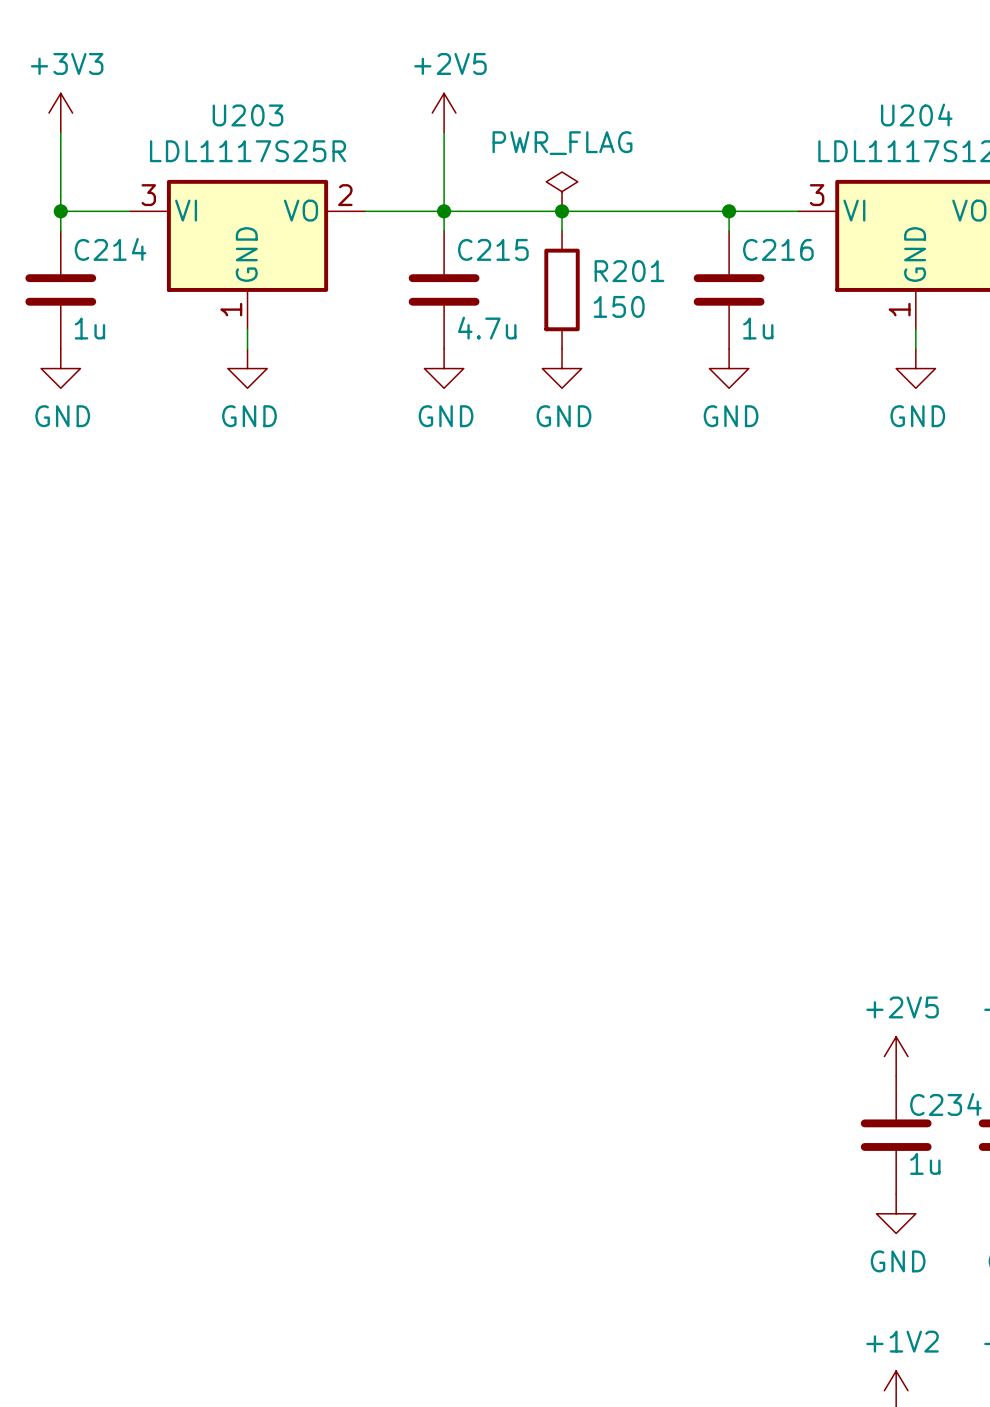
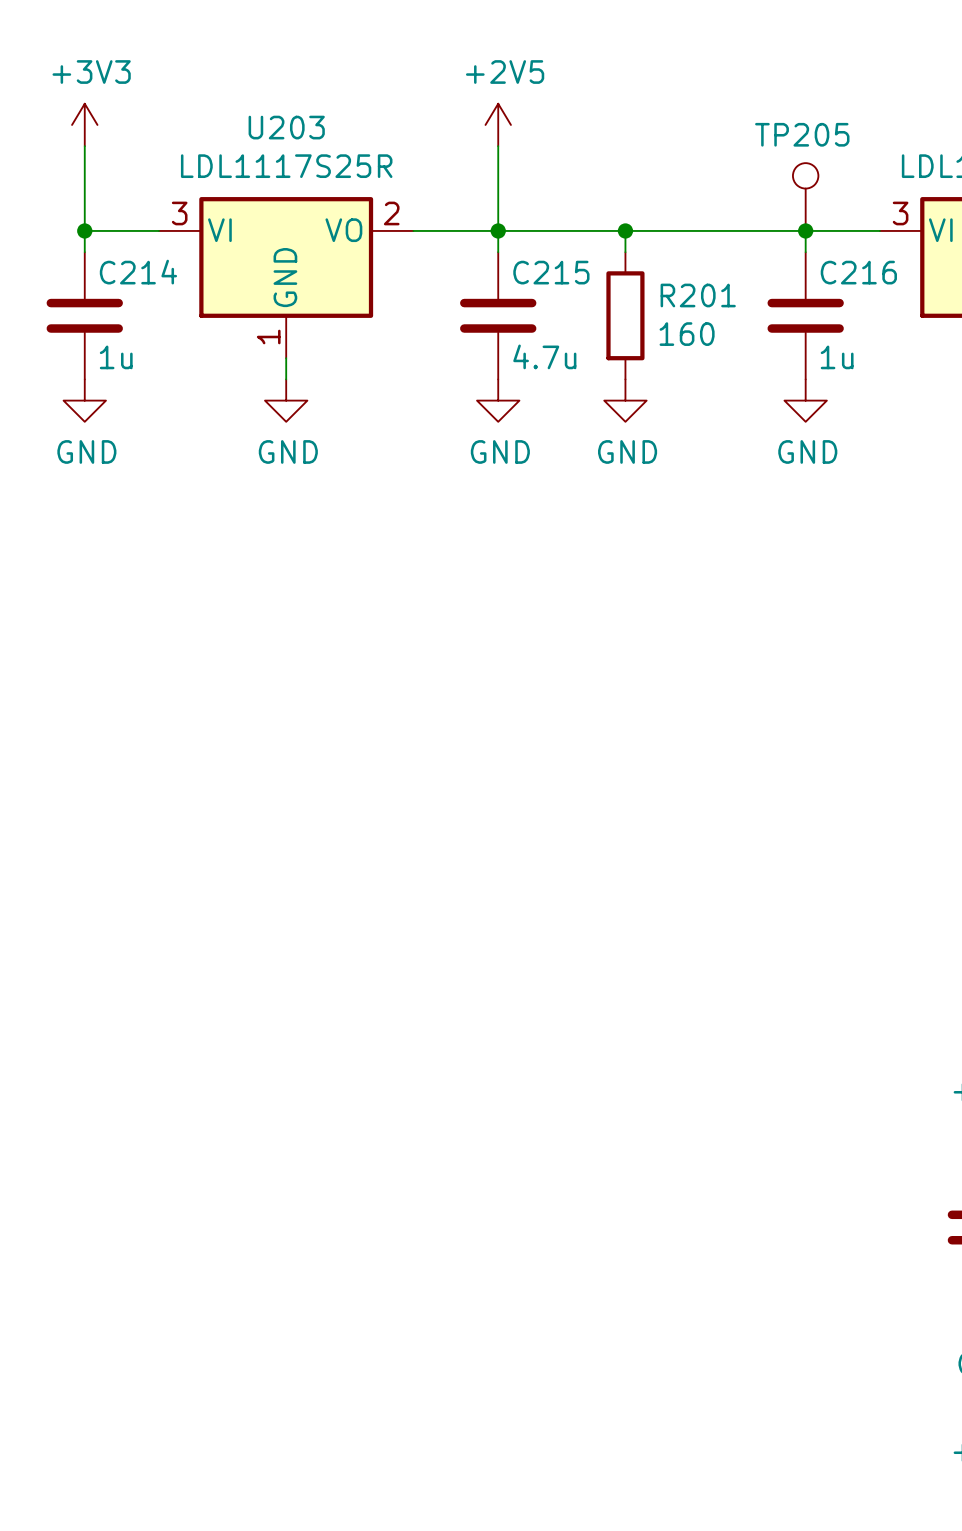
TP205: none -> (805, 197)
power symbol: PWR_FLAG (562, 191) -> none
R201 value: 150 (619, 306) -> 160 (687, 334)

